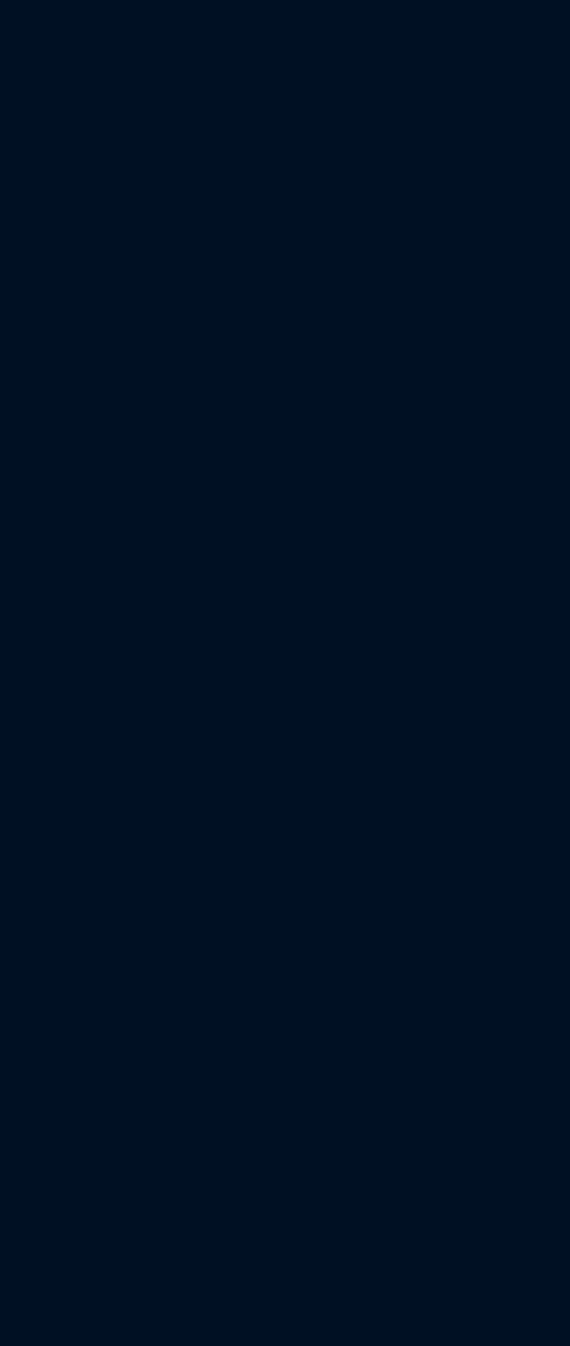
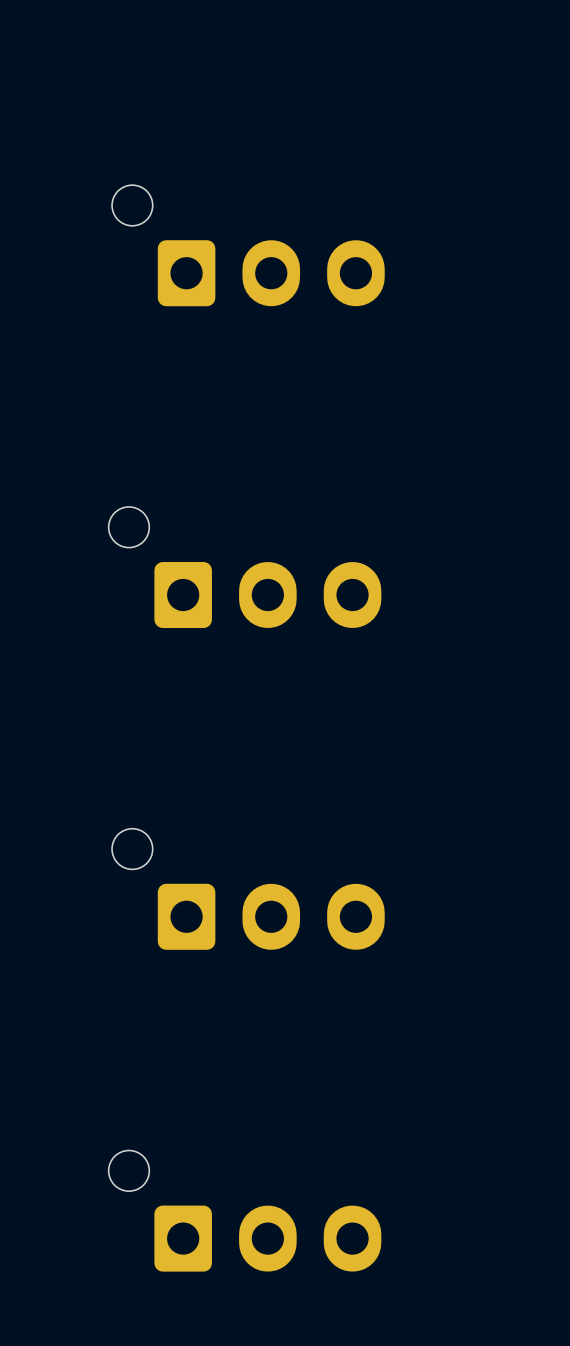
part: none -> (248, 245)
part: none -> (245, 567)
part: none -> (248, 889)
part: none -> (245, 1211)

